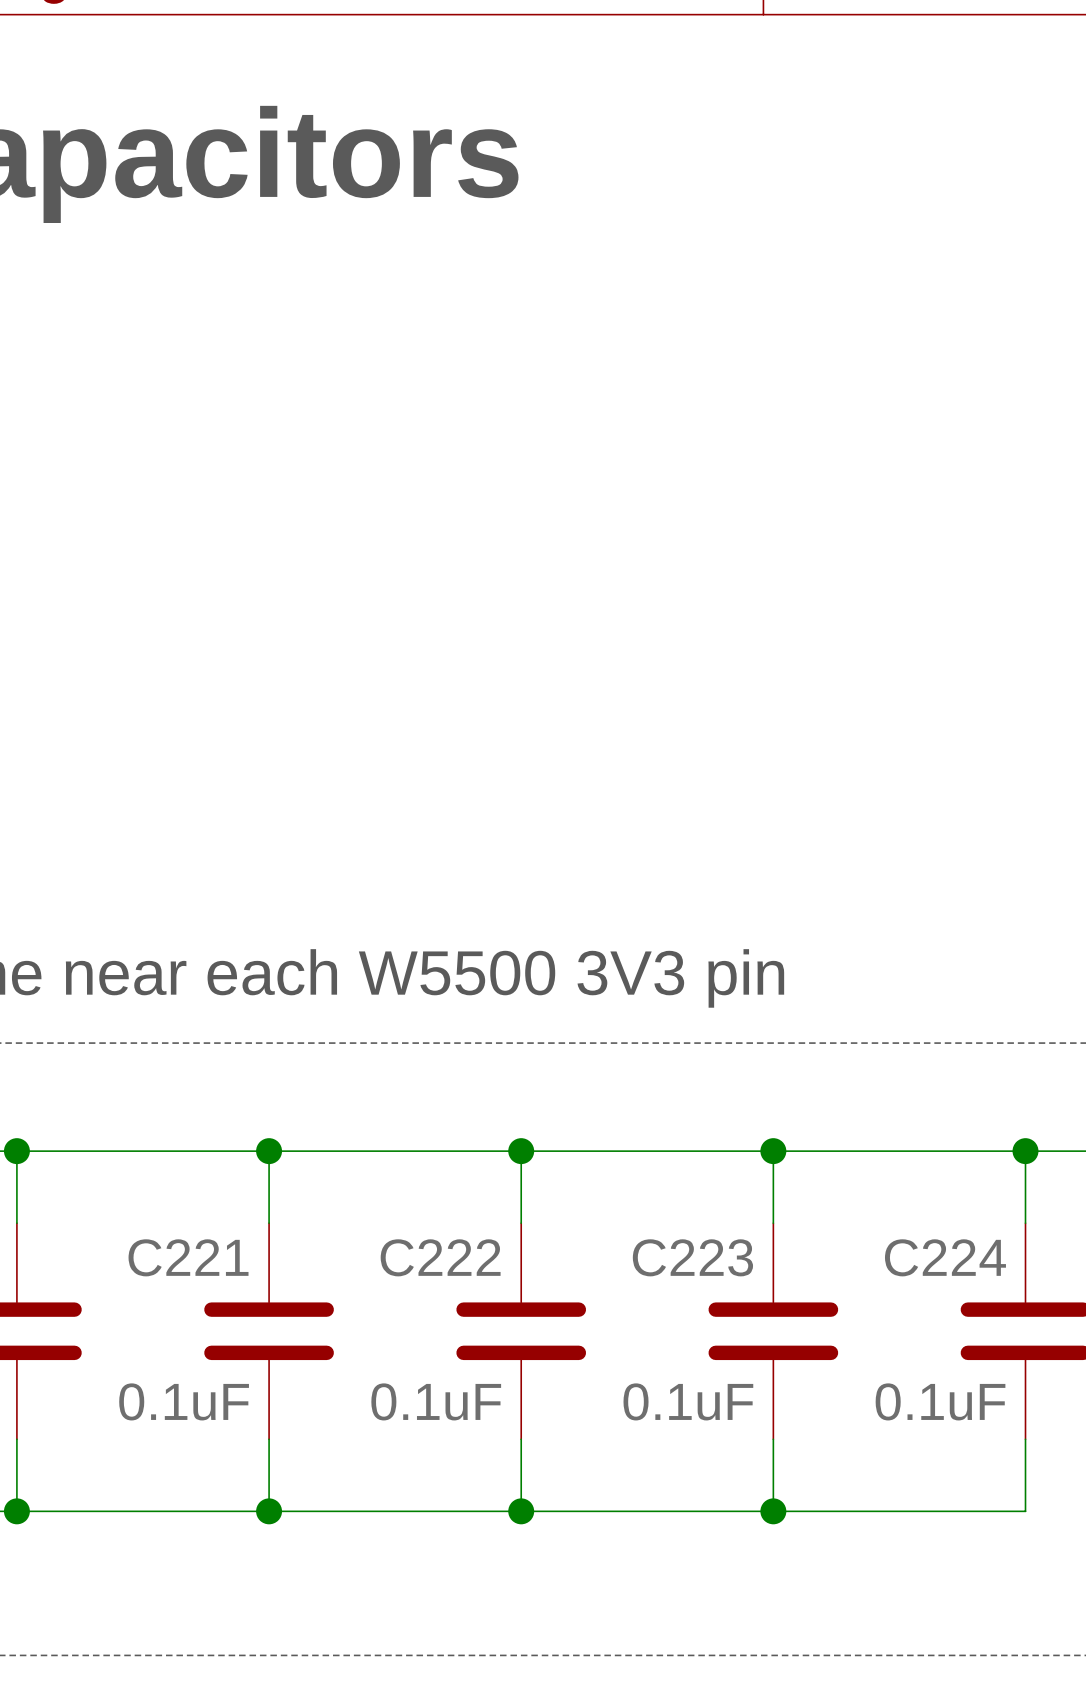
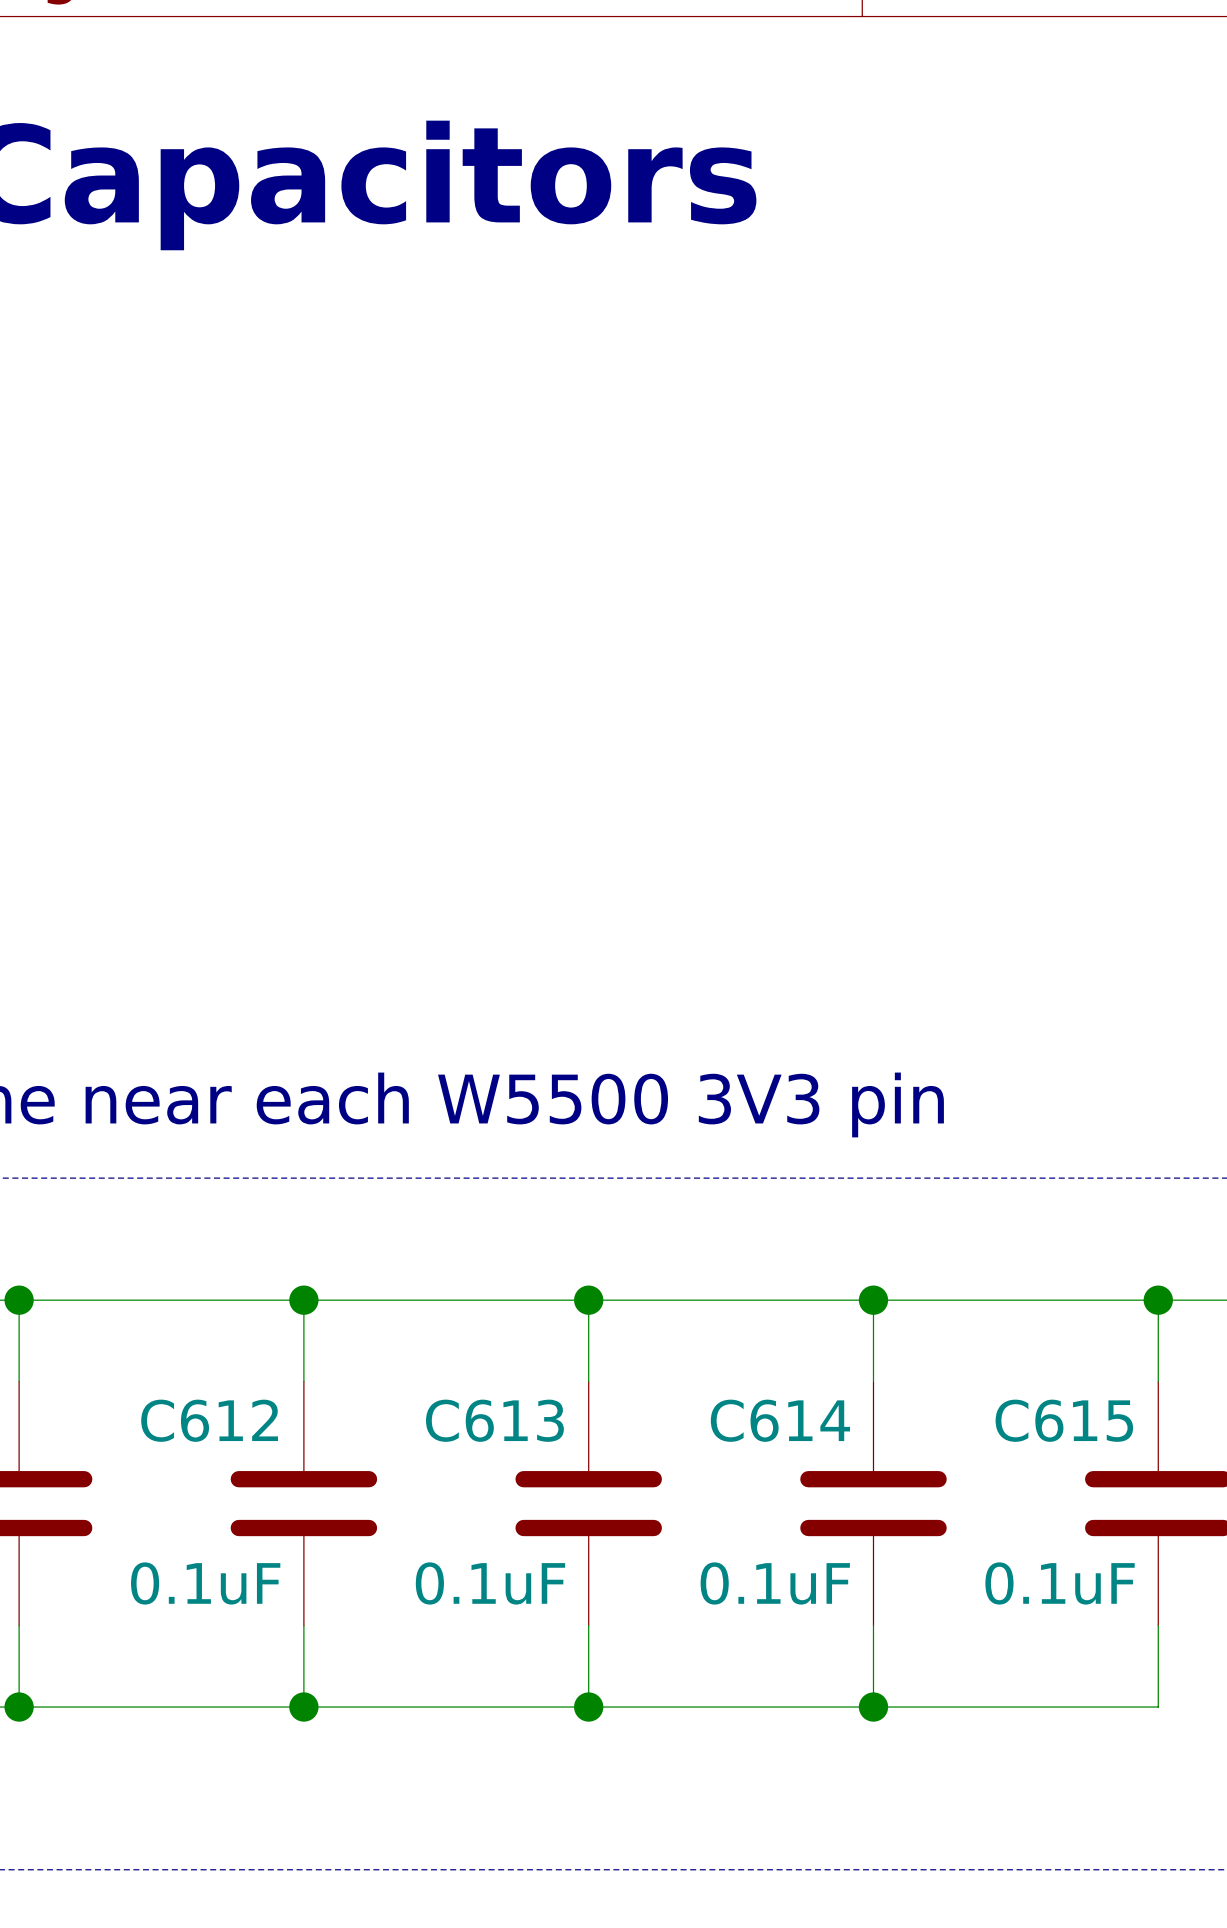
C221 name: C221 (188, 1257) -> C612 (209, 1420)
C222 name: C222 (440, 1257) -> C613 (494, 1420)
C223 name: C223 (692, 1257) -> C614 (780, 1420)
C224 name: C224 (945, 1257) -> C615 (1064, 1420)

